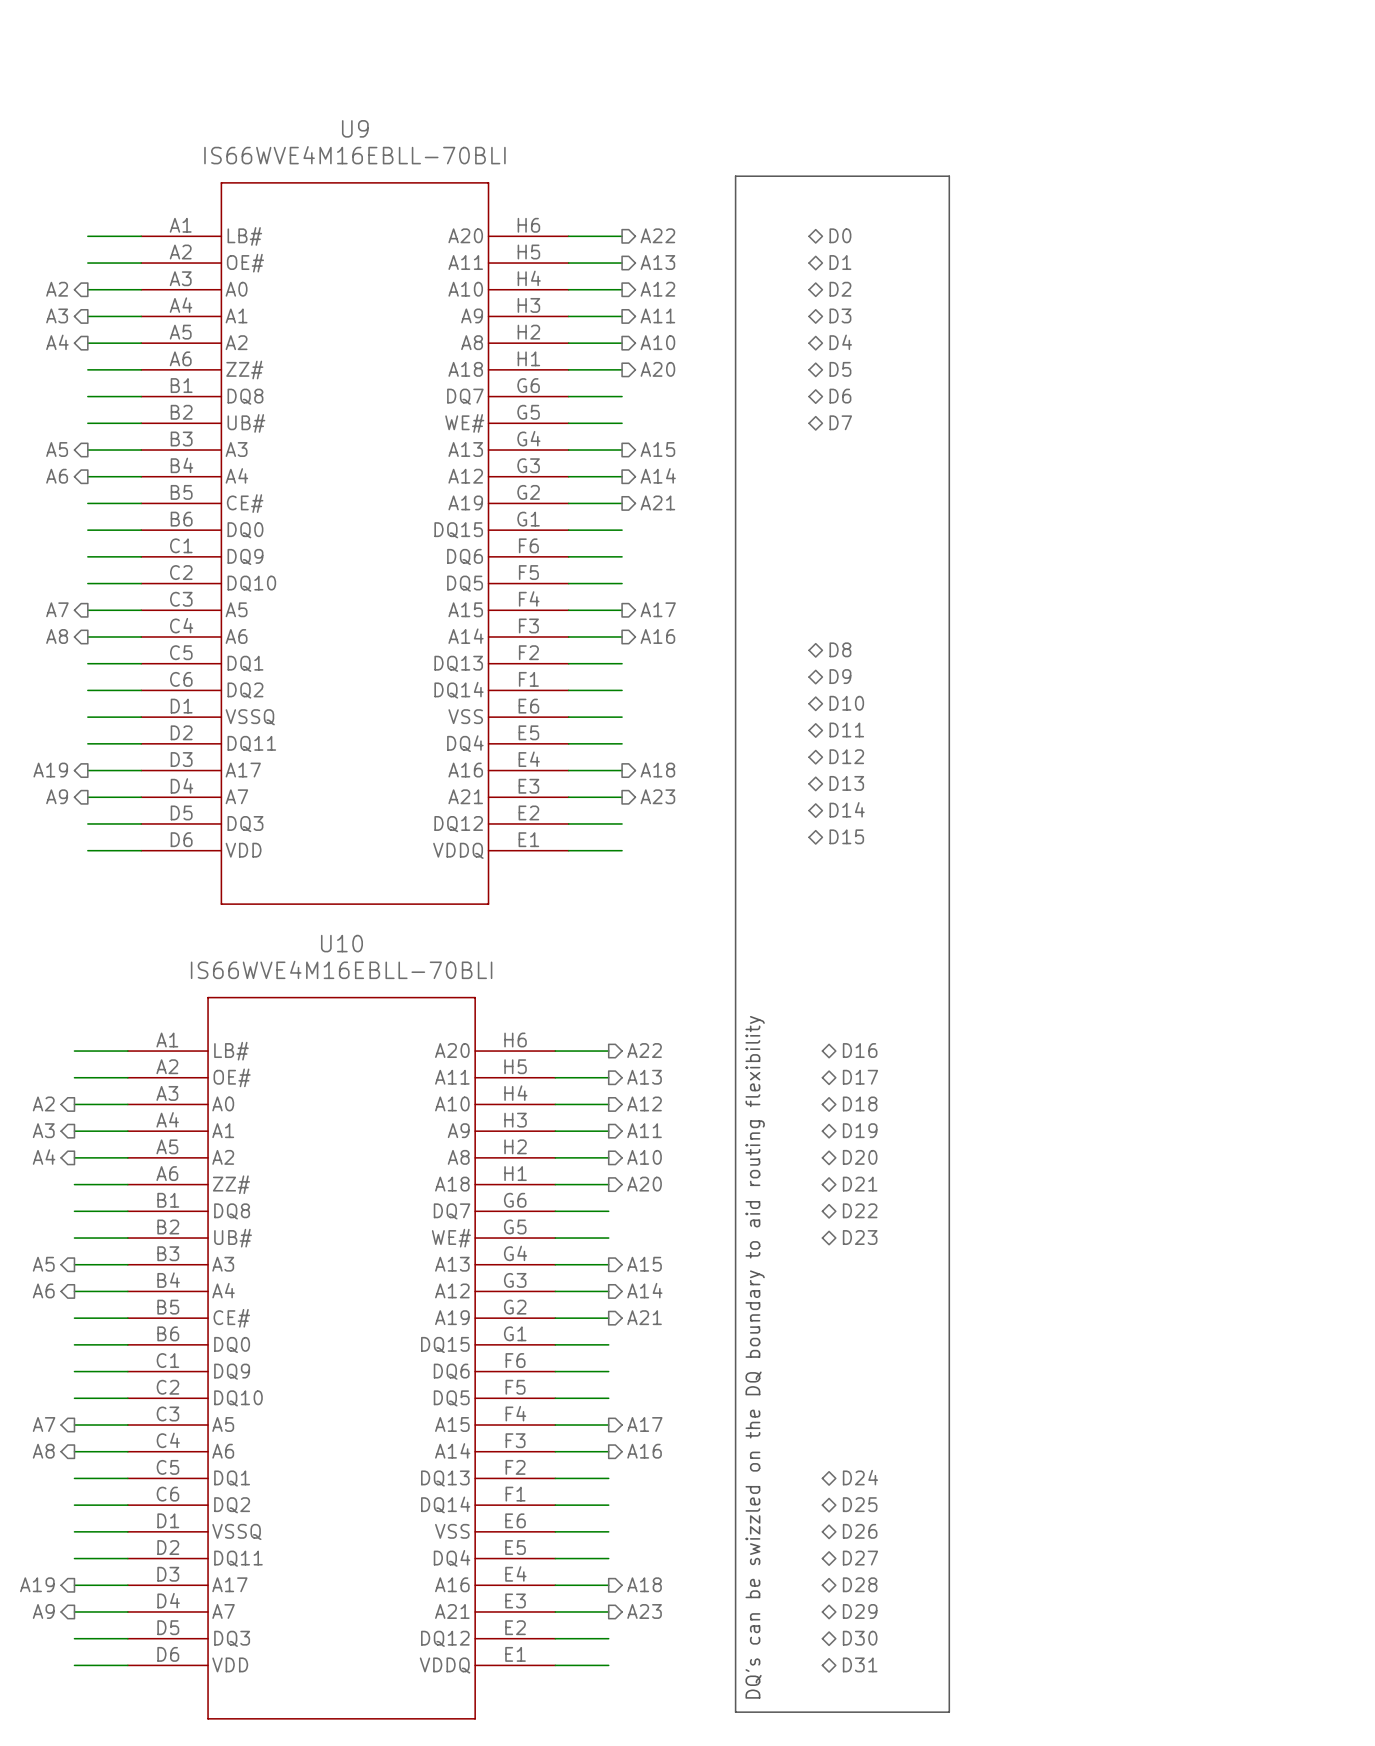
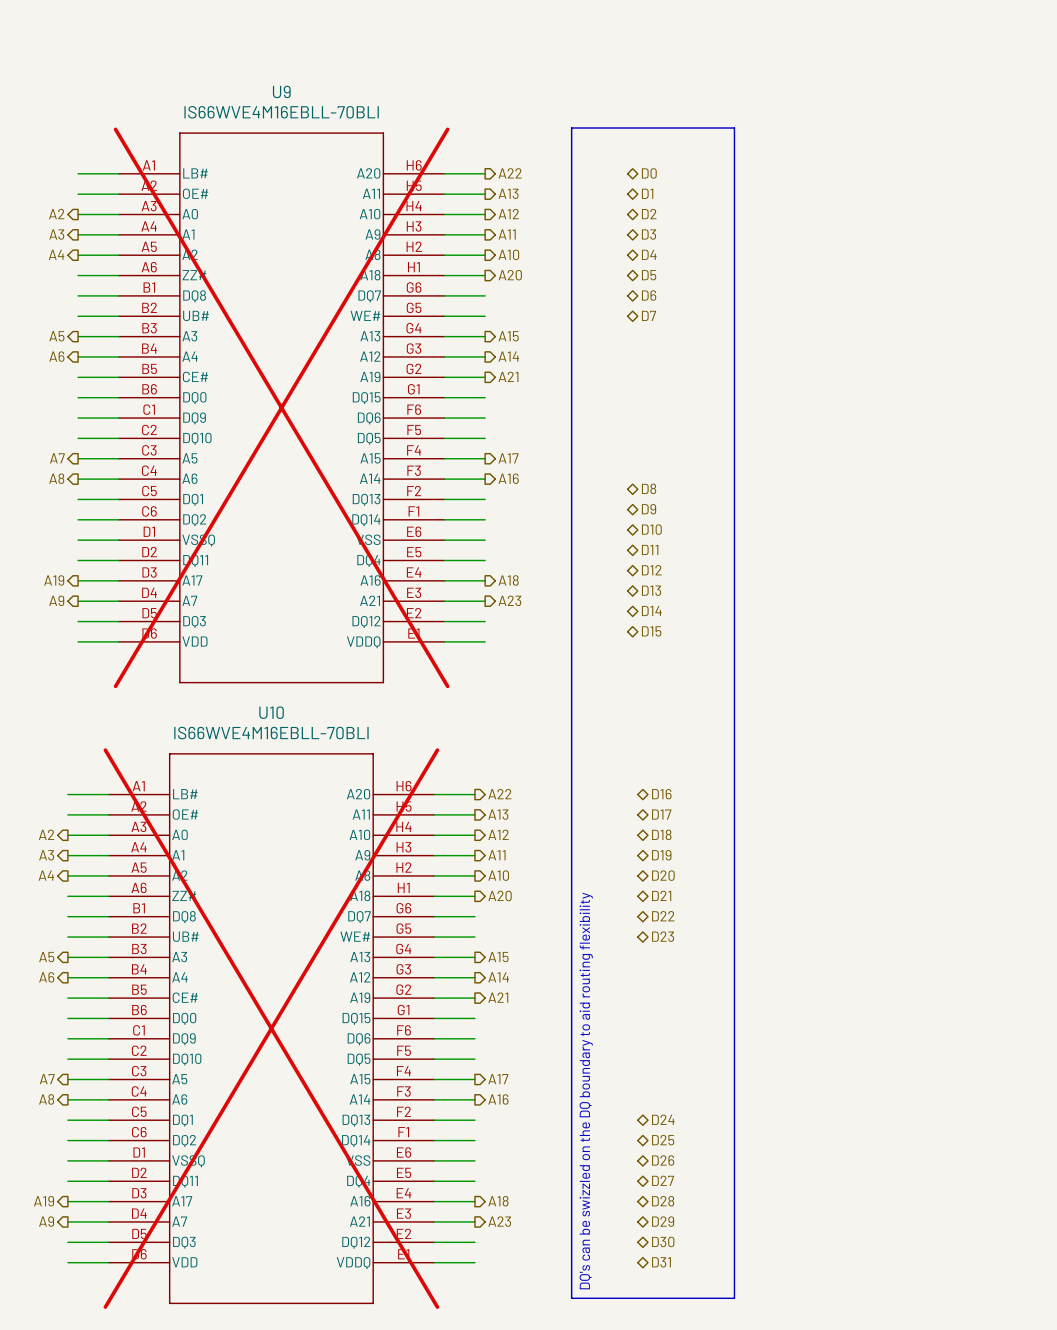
U9 do-not-place cross: none -> (281, 407)
U10 do-not-place cross: none -> (271, 1028)

